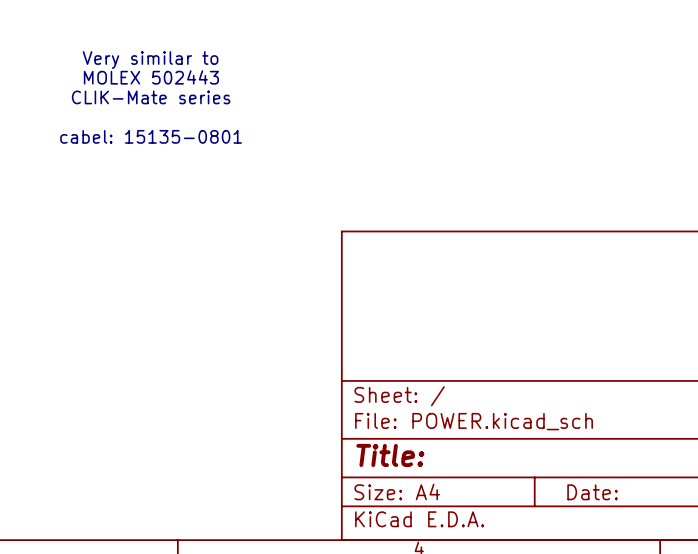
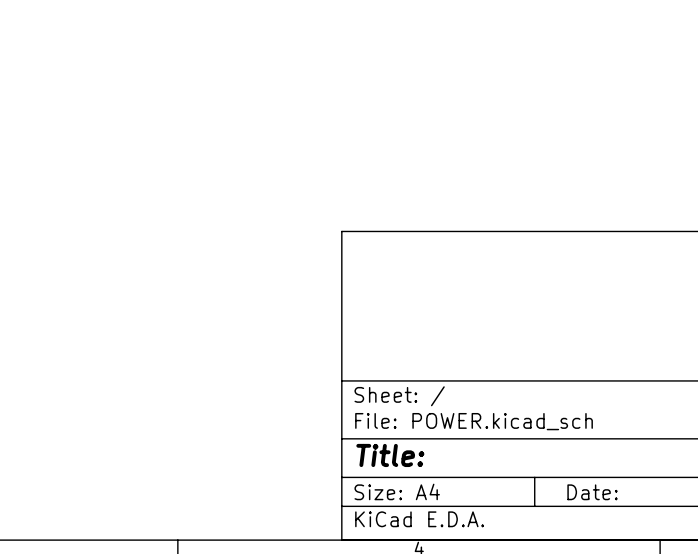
text: Very similar to (150, 60) -> none
text: MOLEX 502443 (151, 77) -> none
text: CLIK-Mate series (151, 97) -> none
text: cabel: 15135-0801 (151, 136) -> none

